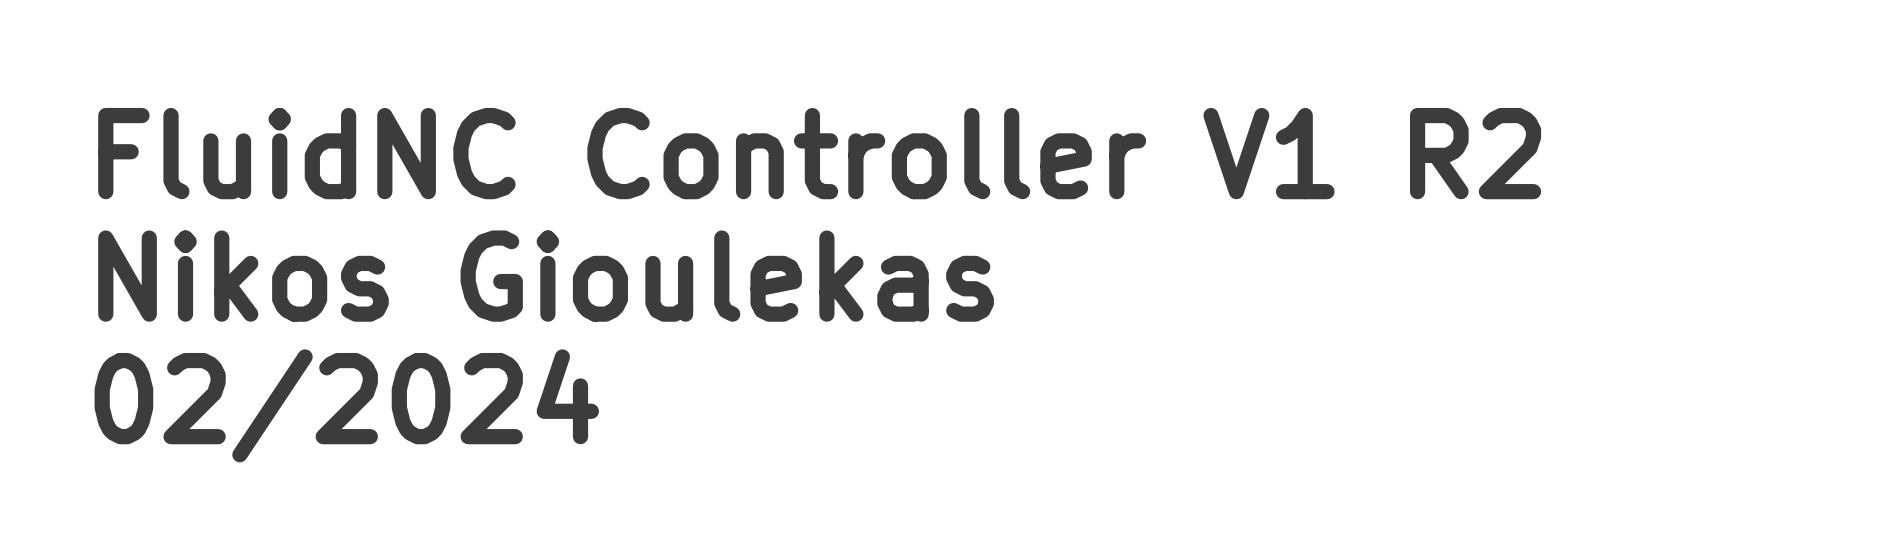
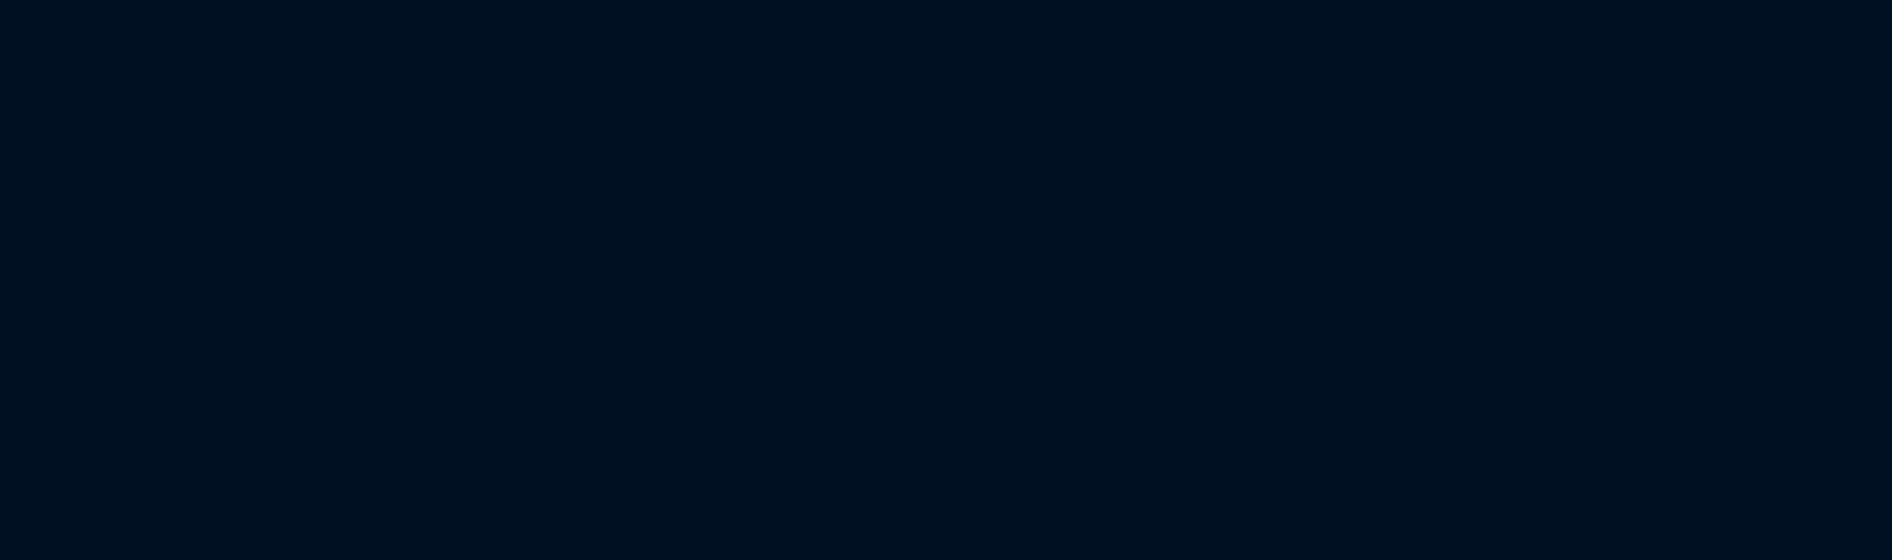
text: FluidNC Controller V1 R2 (819, 153) -> none
text: Nikos Gioulekas (546, 276) -> none
text: 02/2024 (346, 405) -> none

